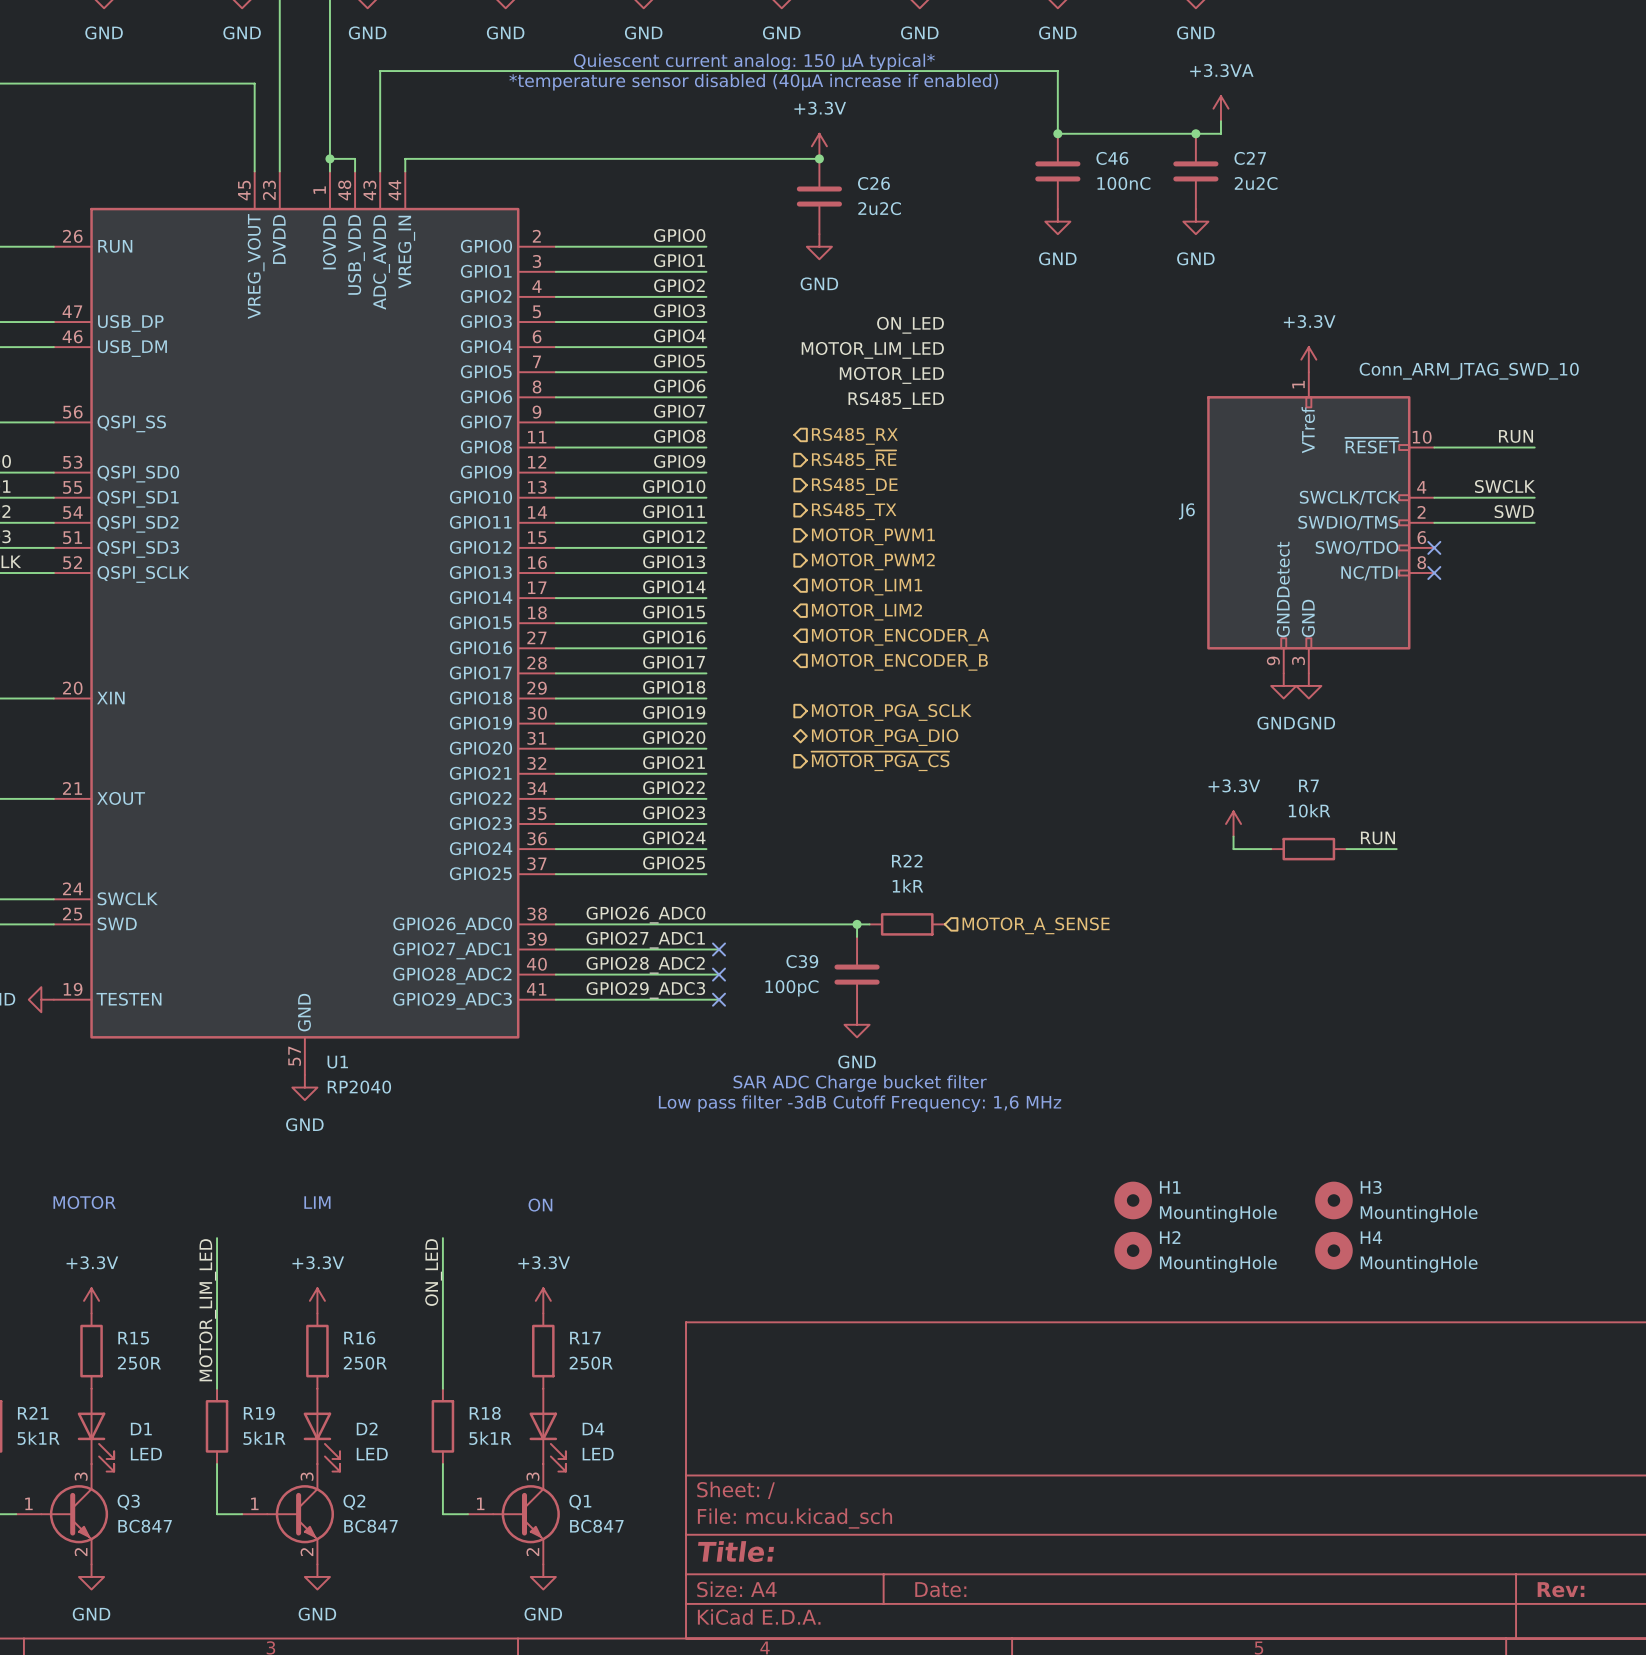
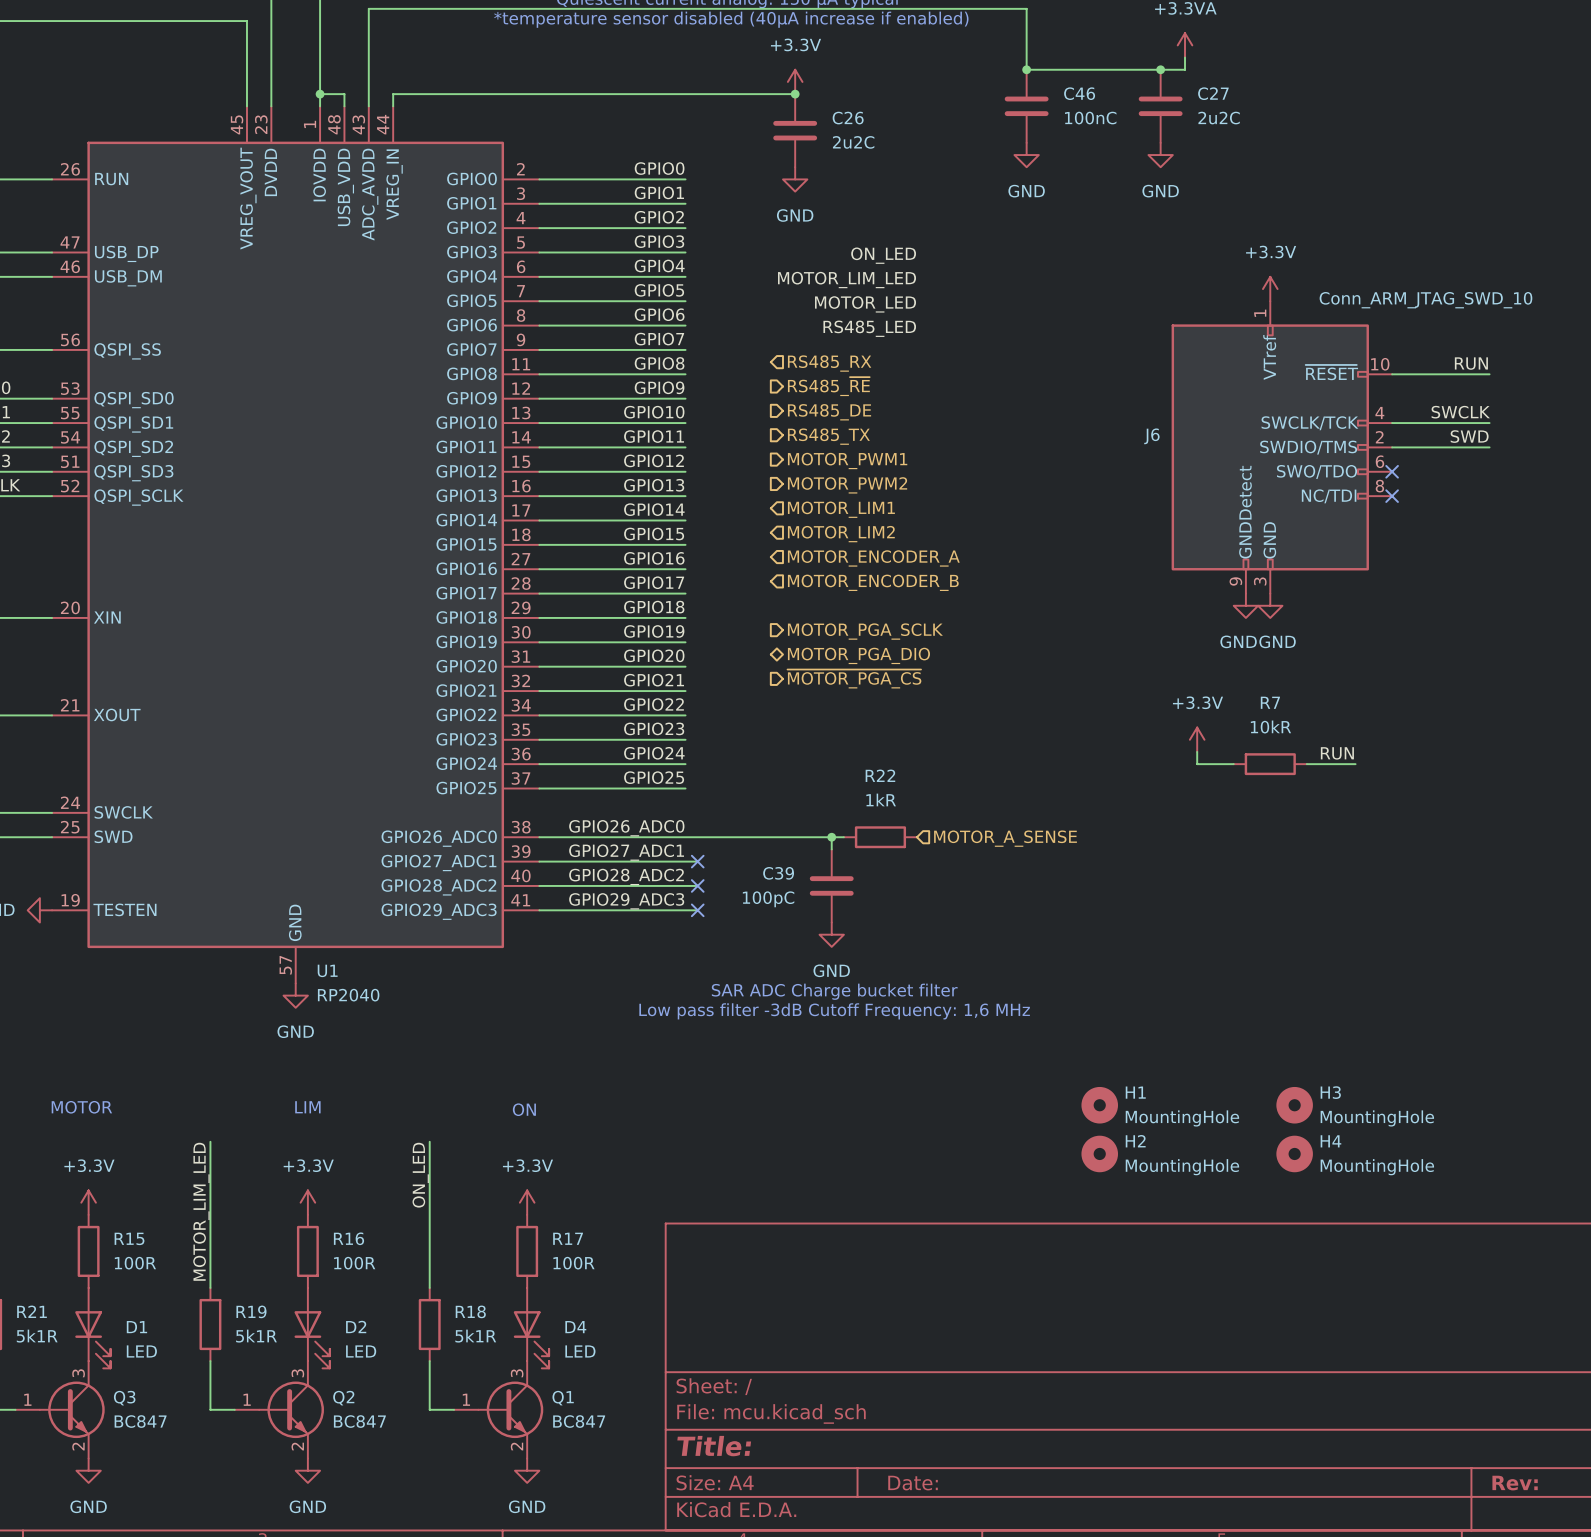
R15 value: 250R (139, 1363) -> 100R (135, 1263)
R16 value: 250R (365, 1363) -> 100R (354, 1263)
R17 value: 250R (591, 1363) -> 100R (573, 1263)

